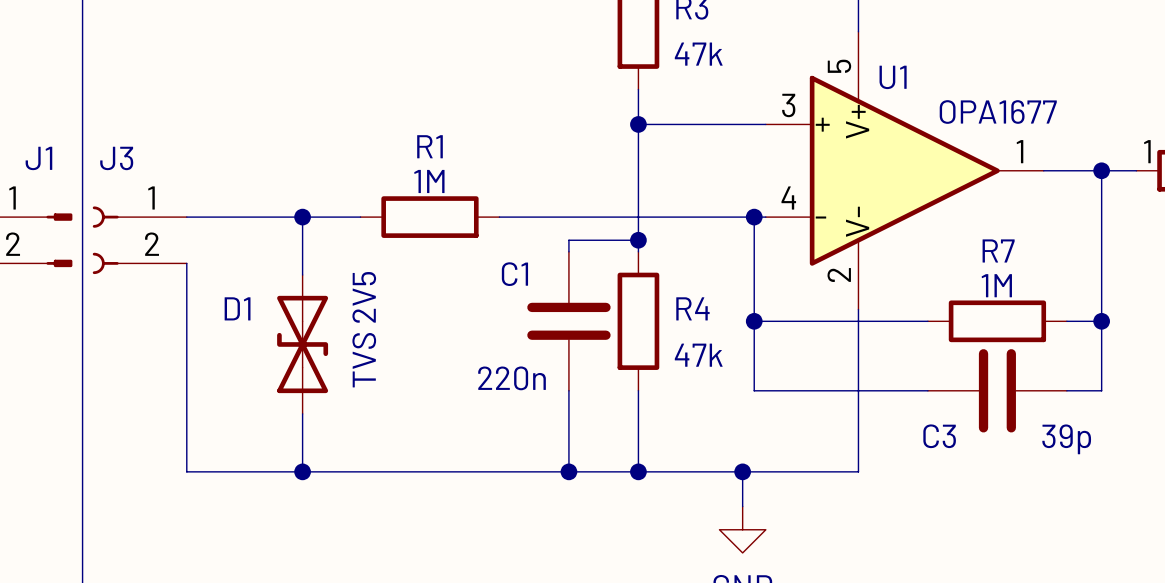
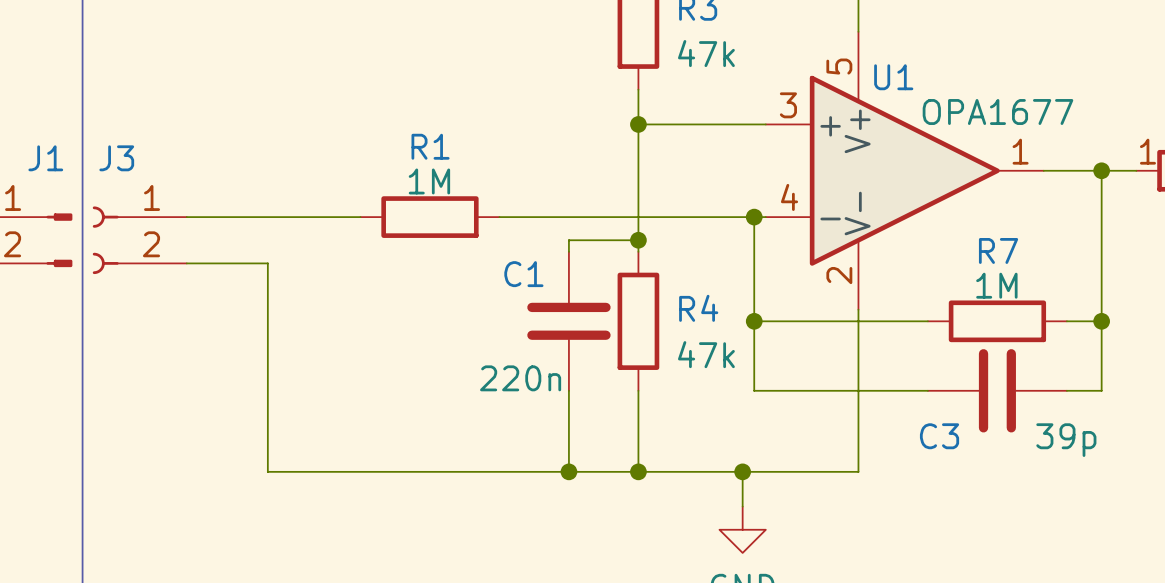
wire: (302, 217) (302, 274) -> none
junction: (302, 217) -> none
wire: (186, 263) (186, 471) (267, 471) -> (186, 263) (267, 263) (267, 471)
D1: TVS 2V5 (302, 344) -> none
wire: (302, 413) (302, 471) -> none
junction: (302, 471) -> none

